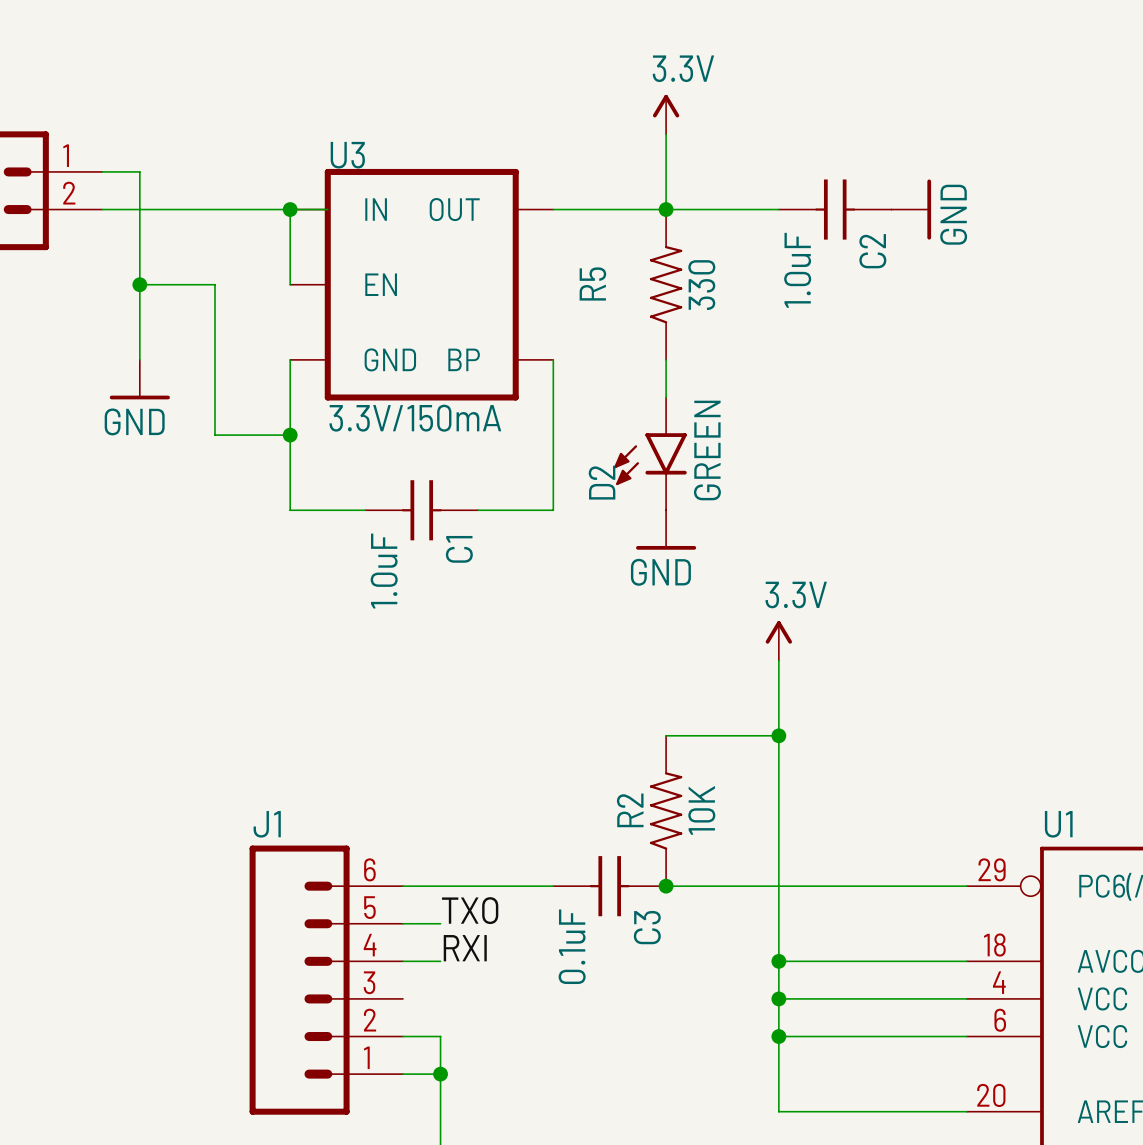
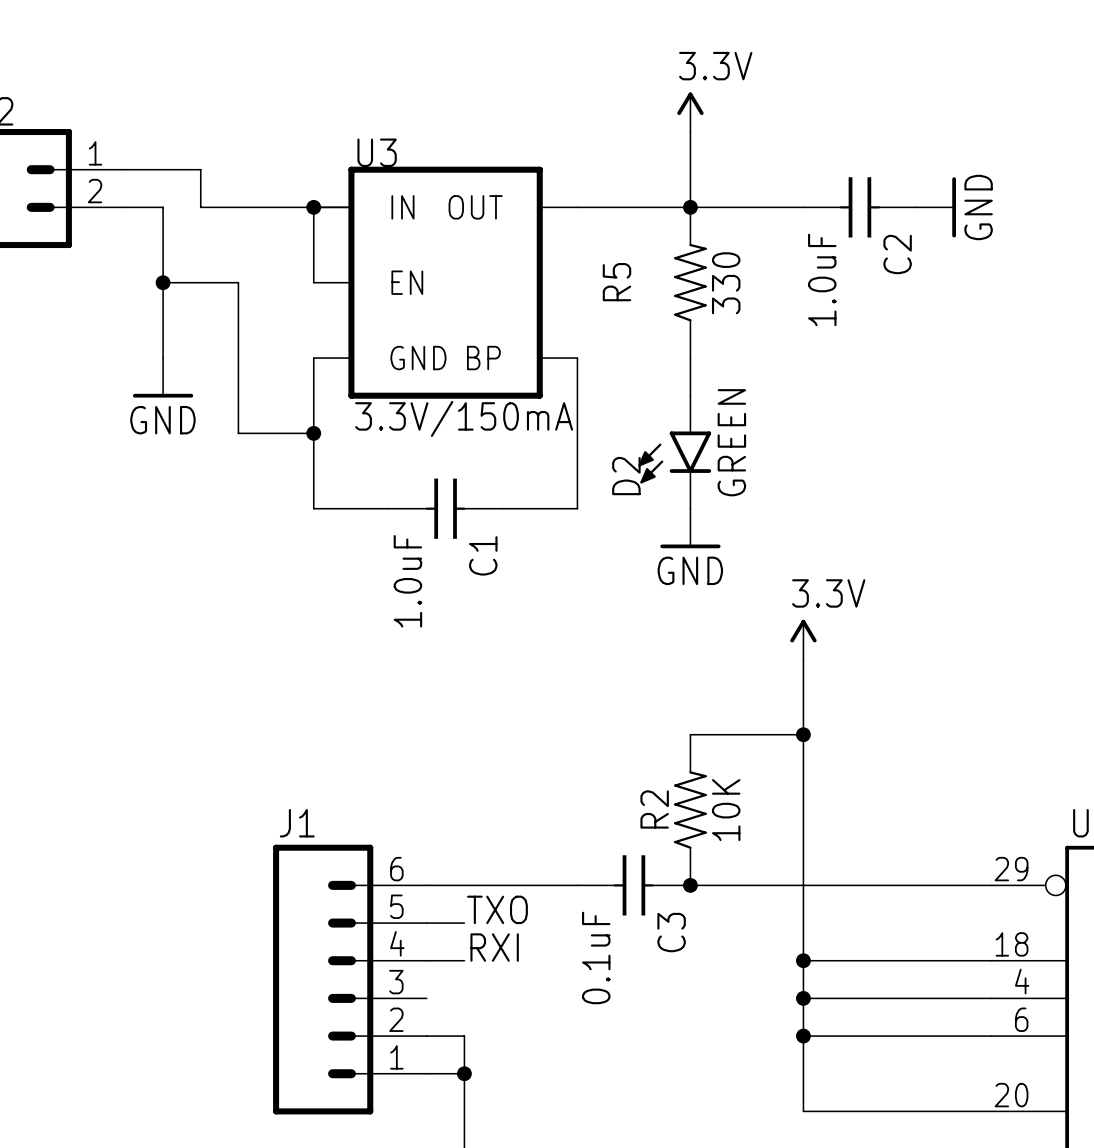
wire: (139, 171) (139, 209) (177, 209) -> (163, 169) (200, 169) (200, 207)

